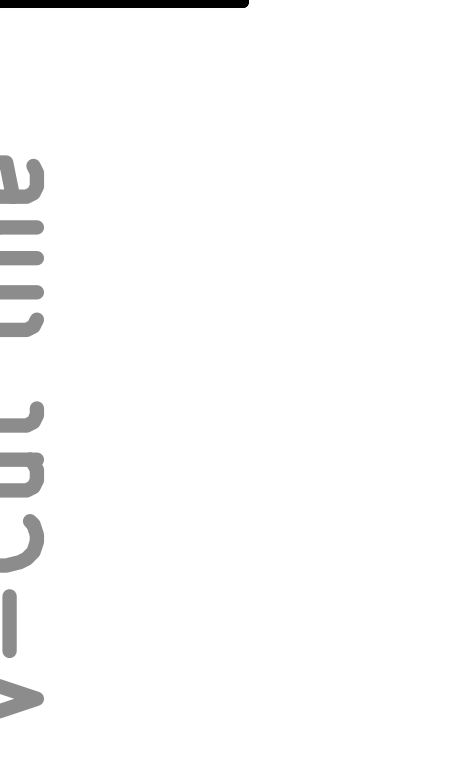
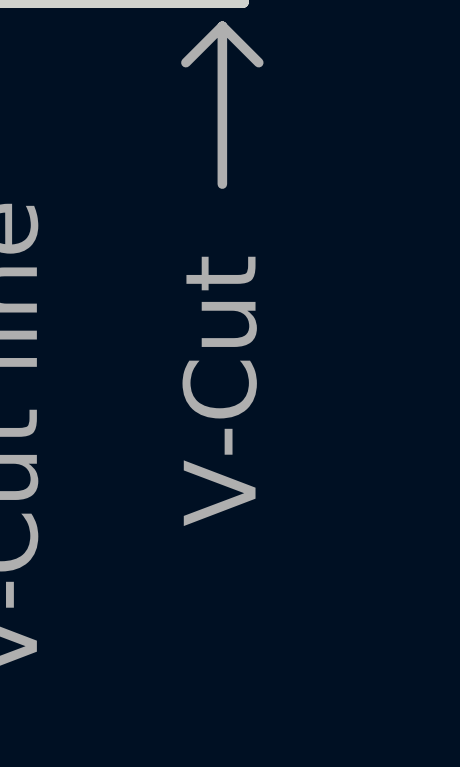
line: none -> (222, 26) (258, 62)
line: none -> (222, 26) (185, 62)
line: none -> (222, 26) (222, 184)
text: none -> V-Cut (219, 391)

